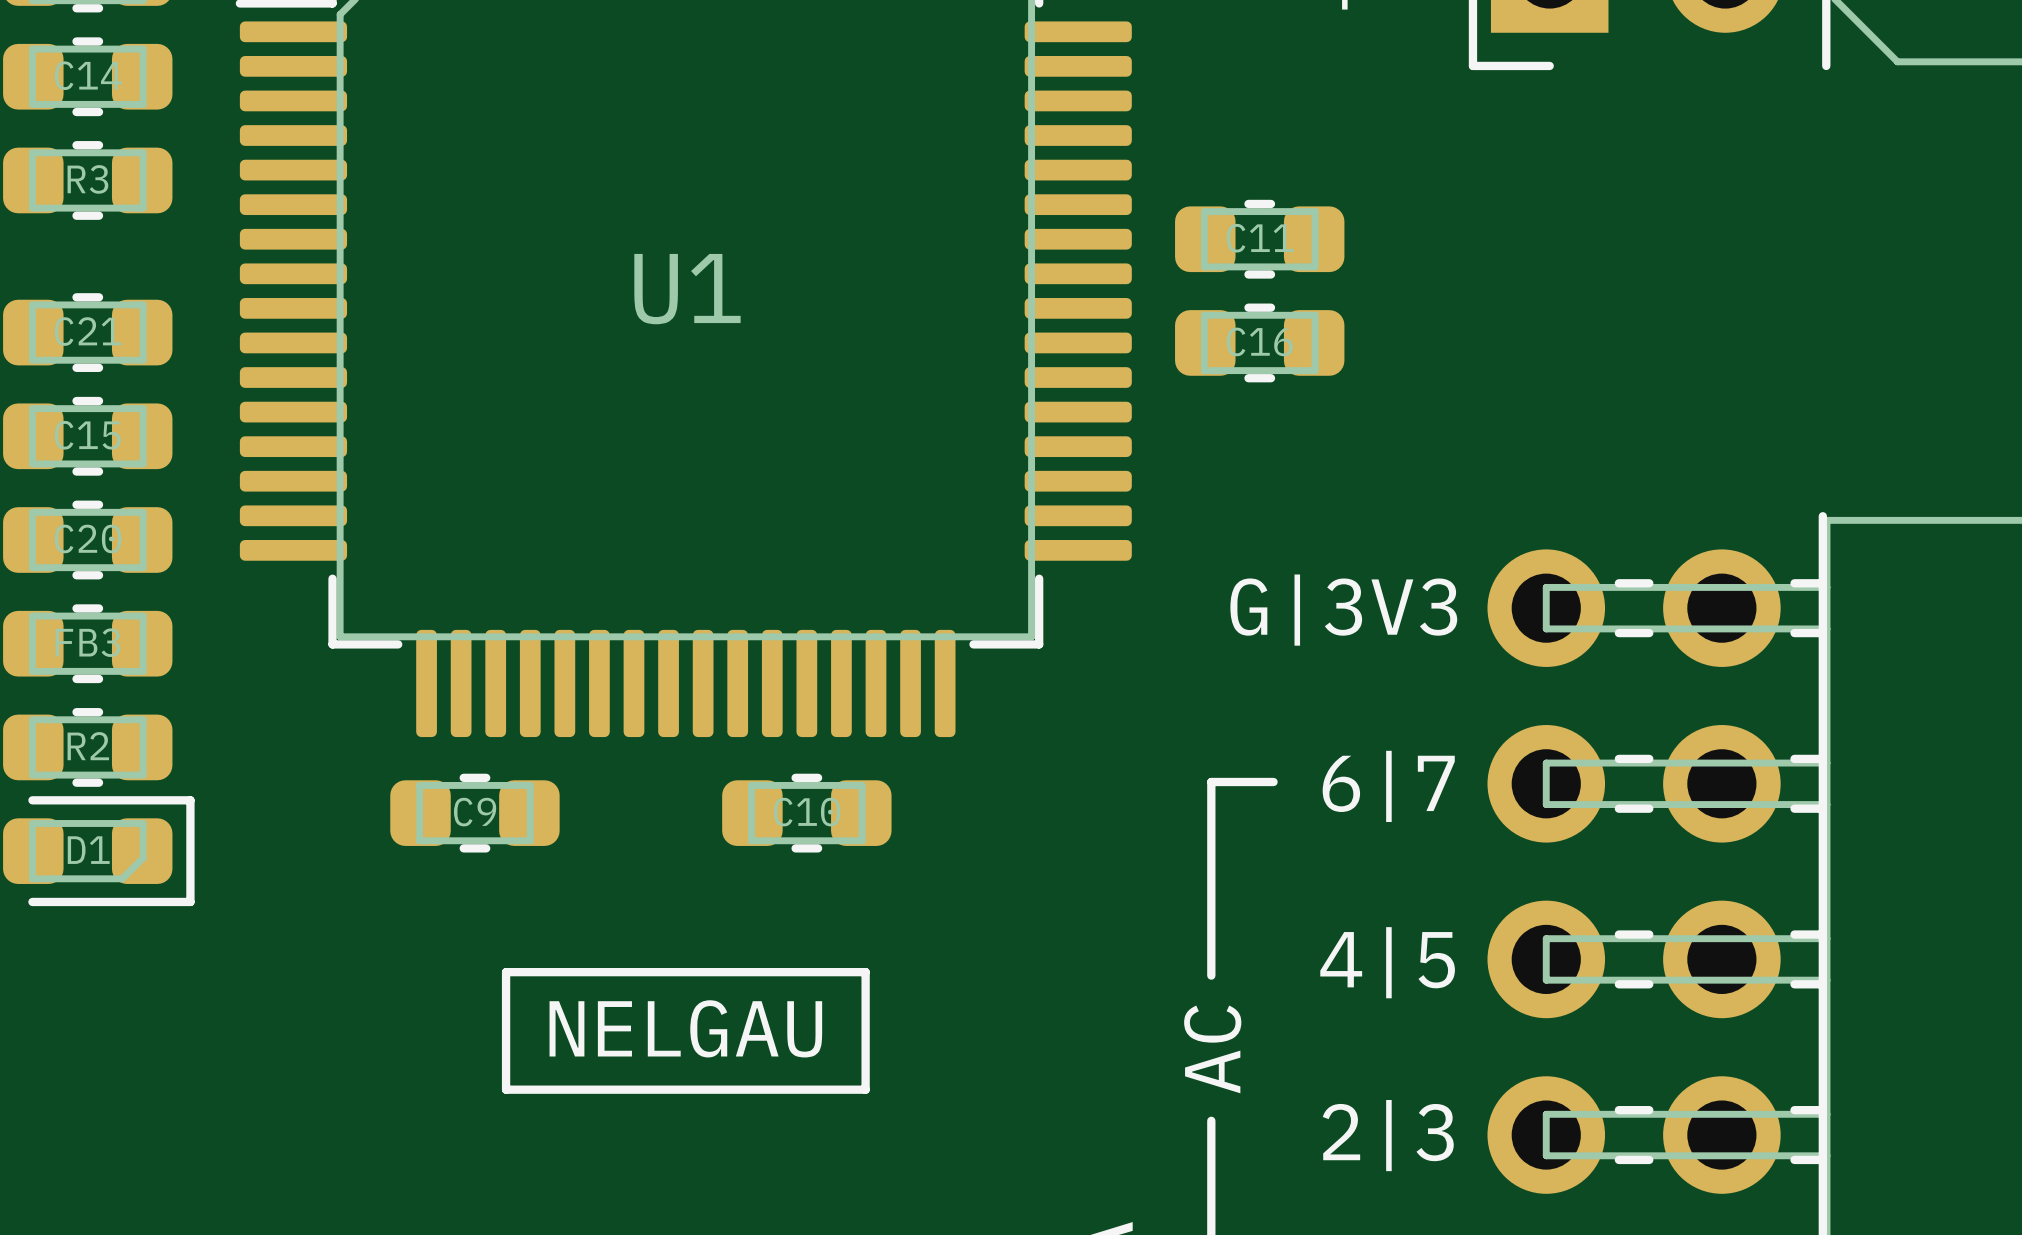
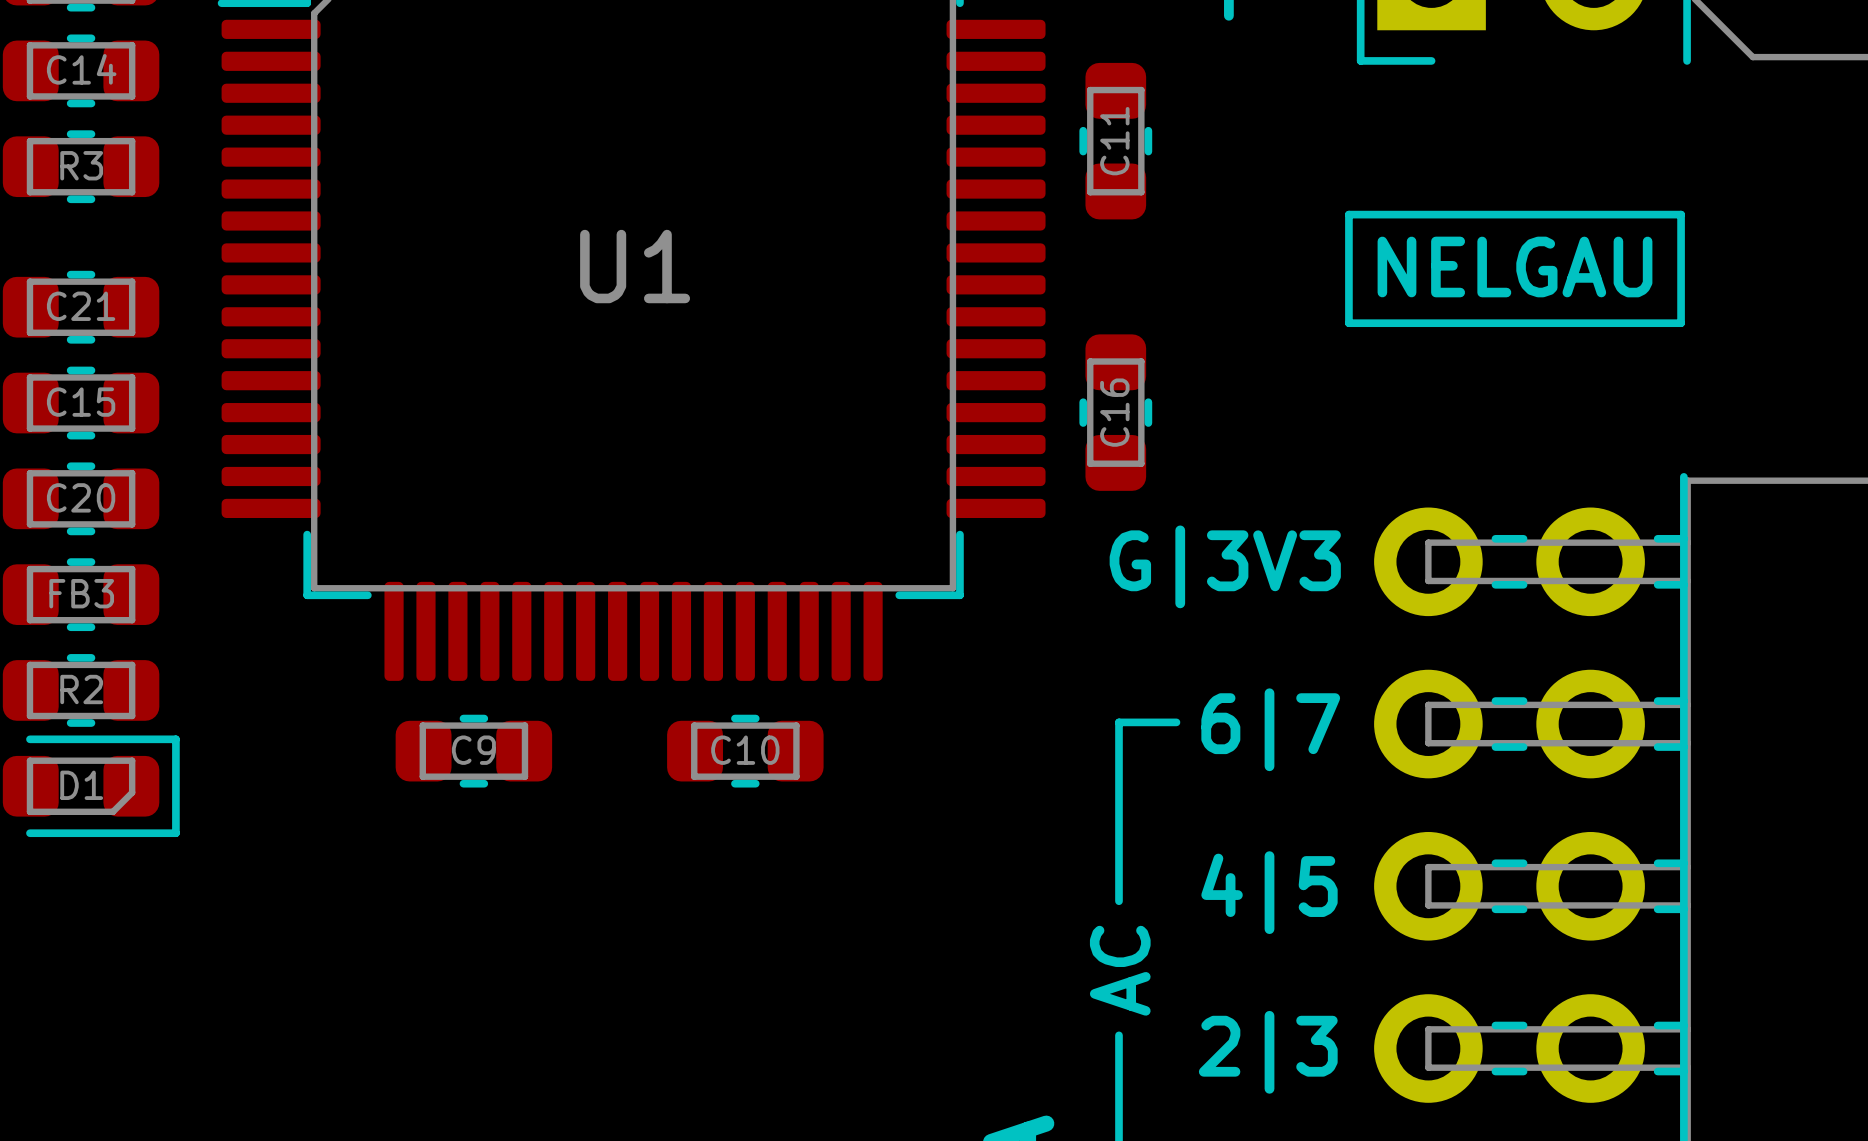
C11 rotation: 0° (1259, 239) -> 90° clockwise (1115, 141)
C16 rotation: 0° (1259, 342) -> 90° clockwise (1115, 412)
C16 position: (1259, 342) -> (1115, 412)
C9 position: (474, 813) -> (473, 751)
drawing position: (685, 1030) -> (1514, 268)

